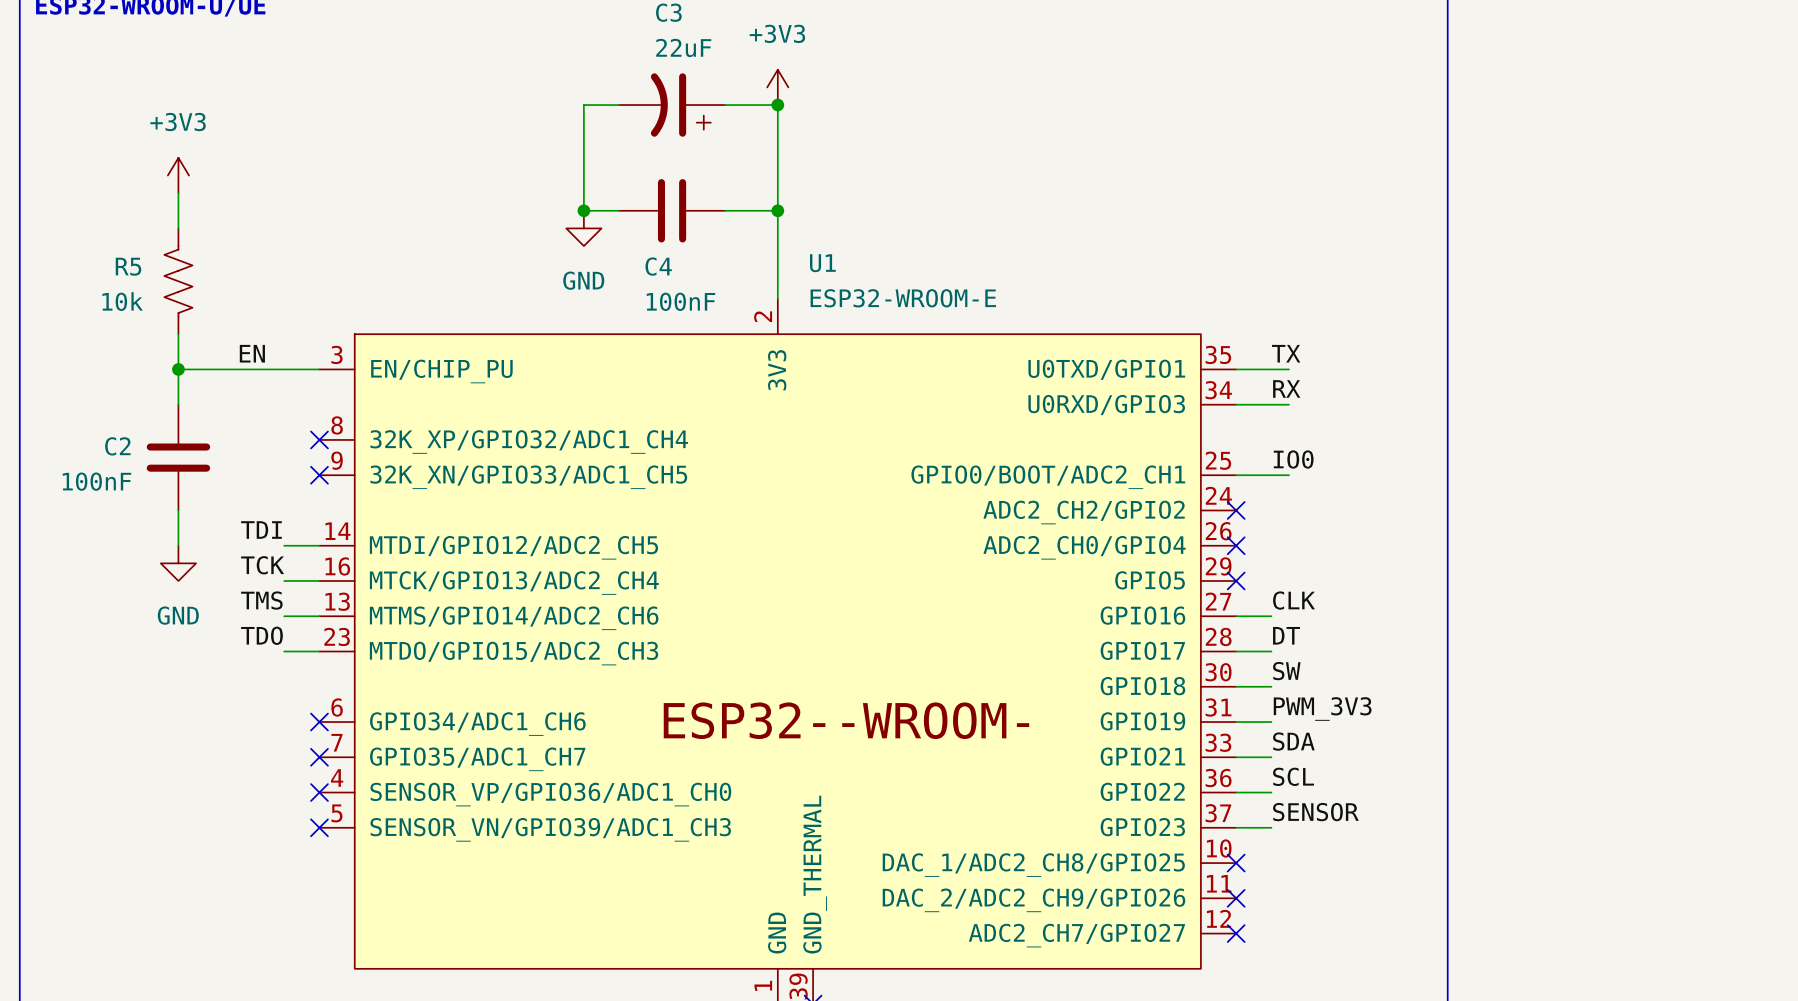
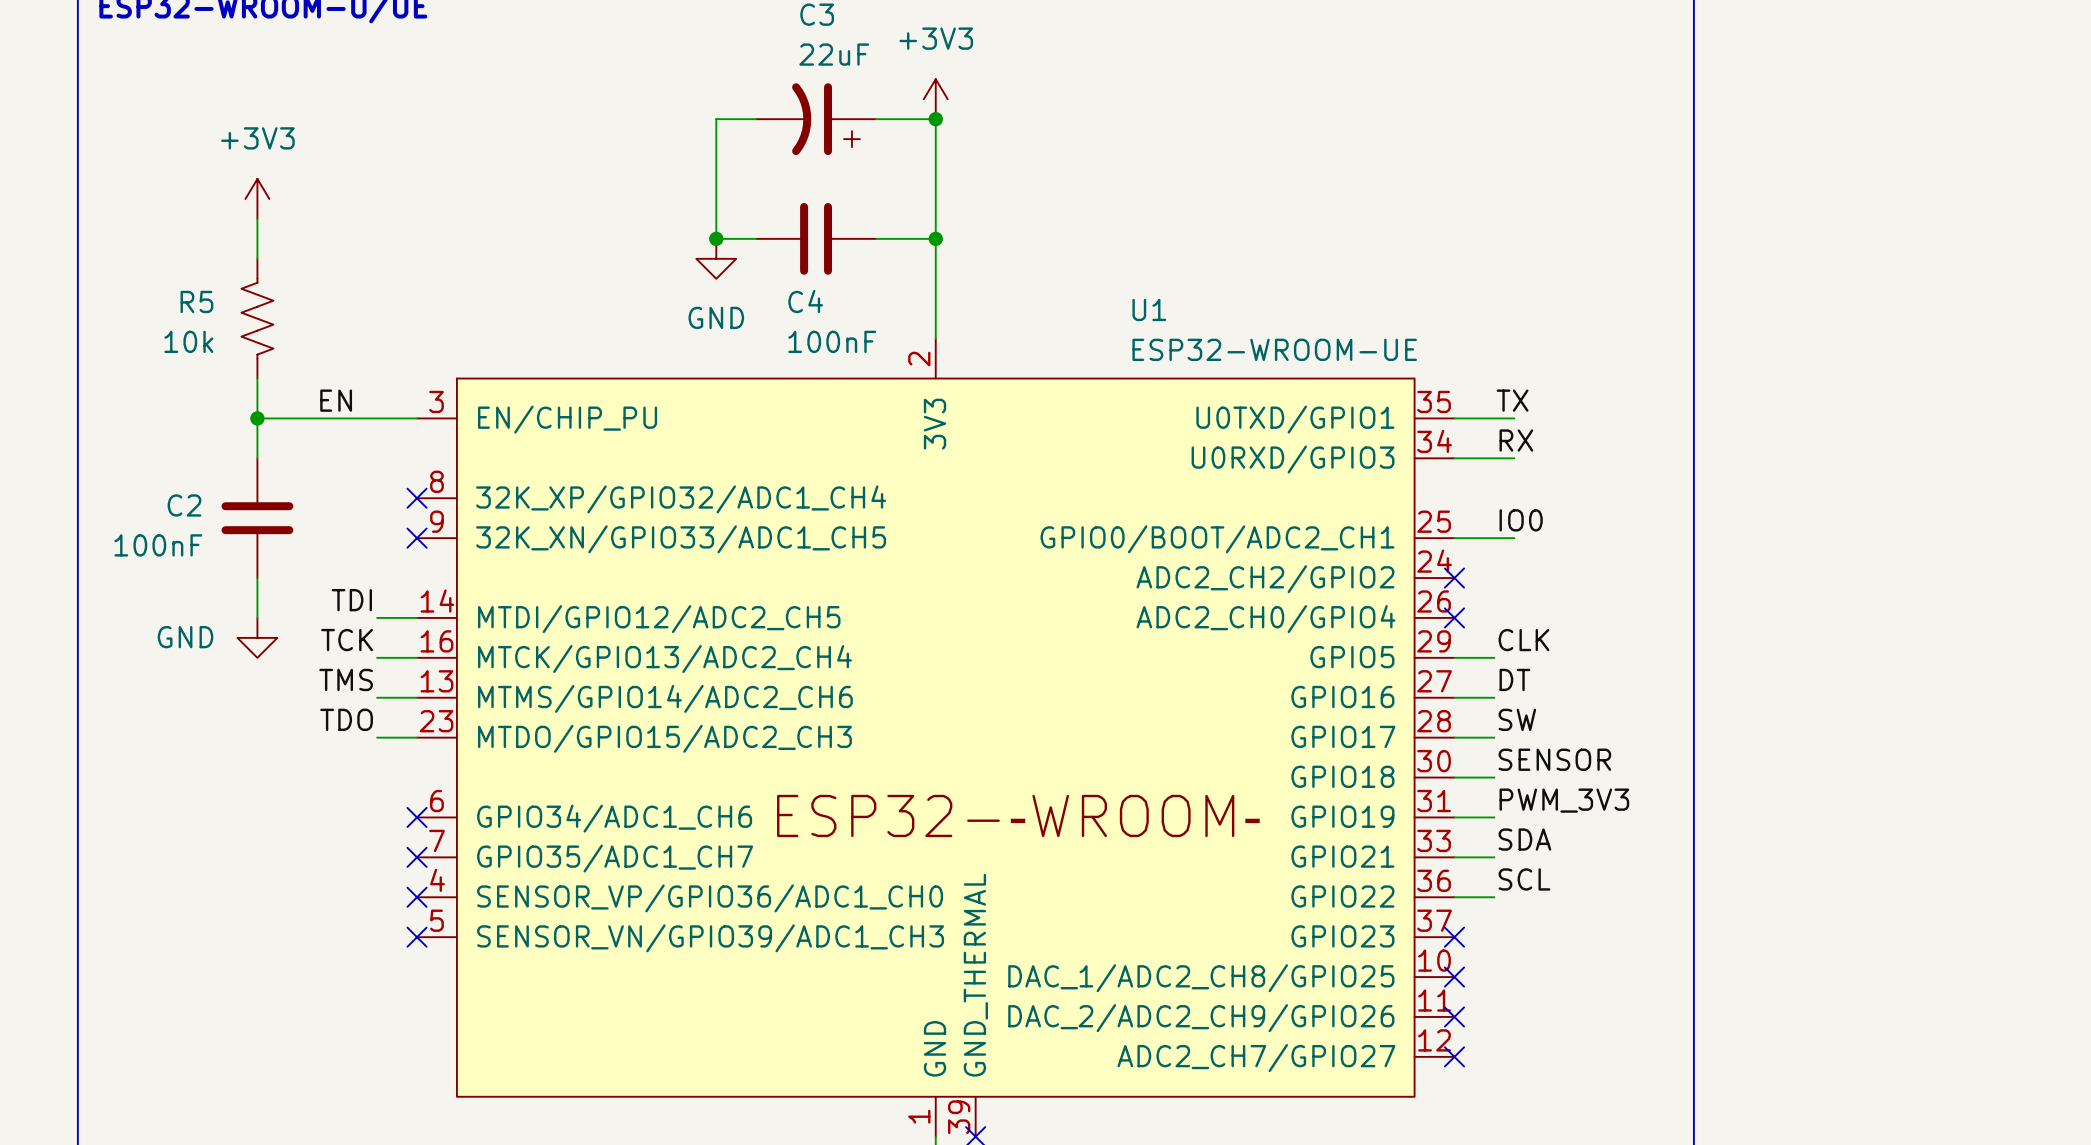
U1 name position: U1 (822, 263) -> U1 (1149, 309)
U1 value: ESP32-WROOM-E (903, 298) -> ESP32-WROOM-UE (1274, 349)
label: none -> CLK (1523, 640)
no-connect mark: (1236, 580) -> none
label: CLK (1294, 600) -> DT (1514, 679)
power symbol text position: GND (178, 615) -> GND (185, 637)
label: DT (1286, 635) -> SW (1517, 719)
label: SW (1286, 671) -> SENSOR (1554, 759)
label: SENSOR (1315, 812) -> none
wire: (1236, 827) (1271, 827) -> (1454, 657) (1494, 657)
no-connect mark: none -> (1454, 937)

